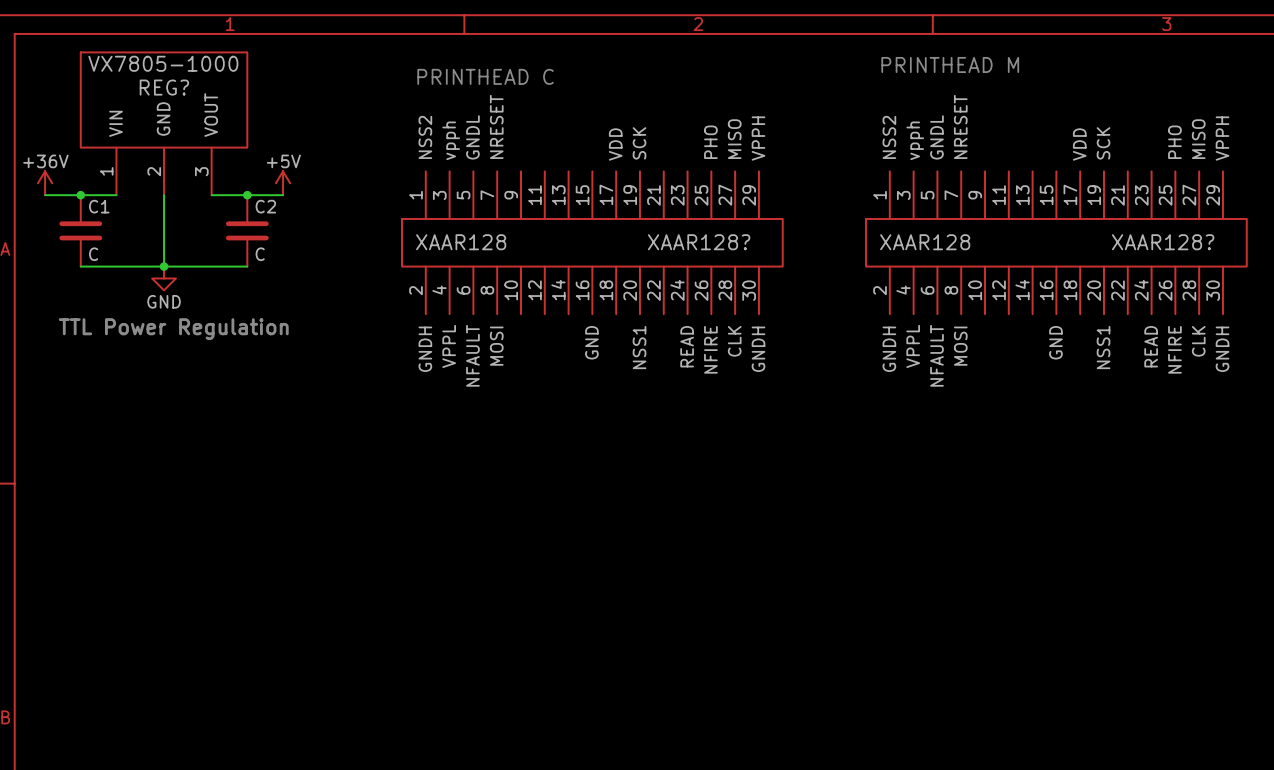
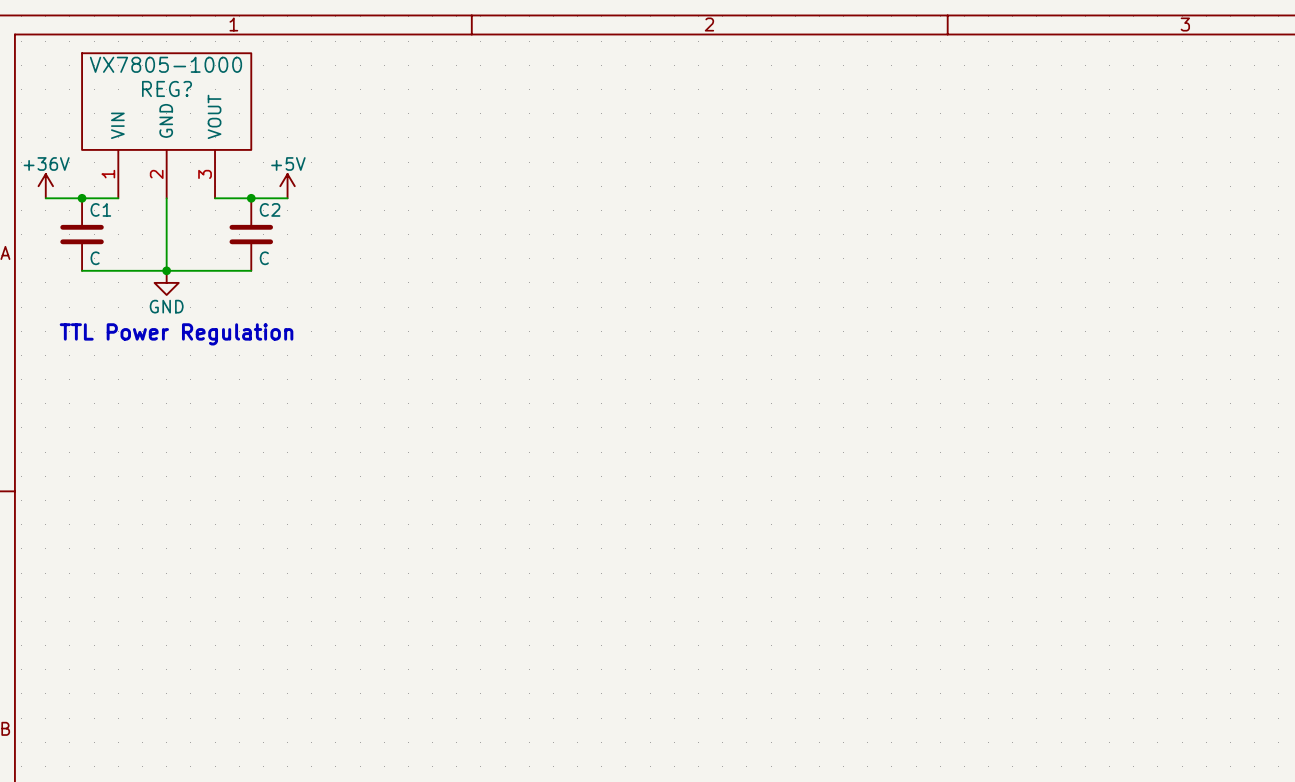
text: PRINTHEAD M (950, 64) -> none
text: PRINTHEAD C (485, 76) -> none
XAAR128?: XAAR128 (592, 242) -> none
XAAR128?: XAAR128 (1056, 242) -> none

